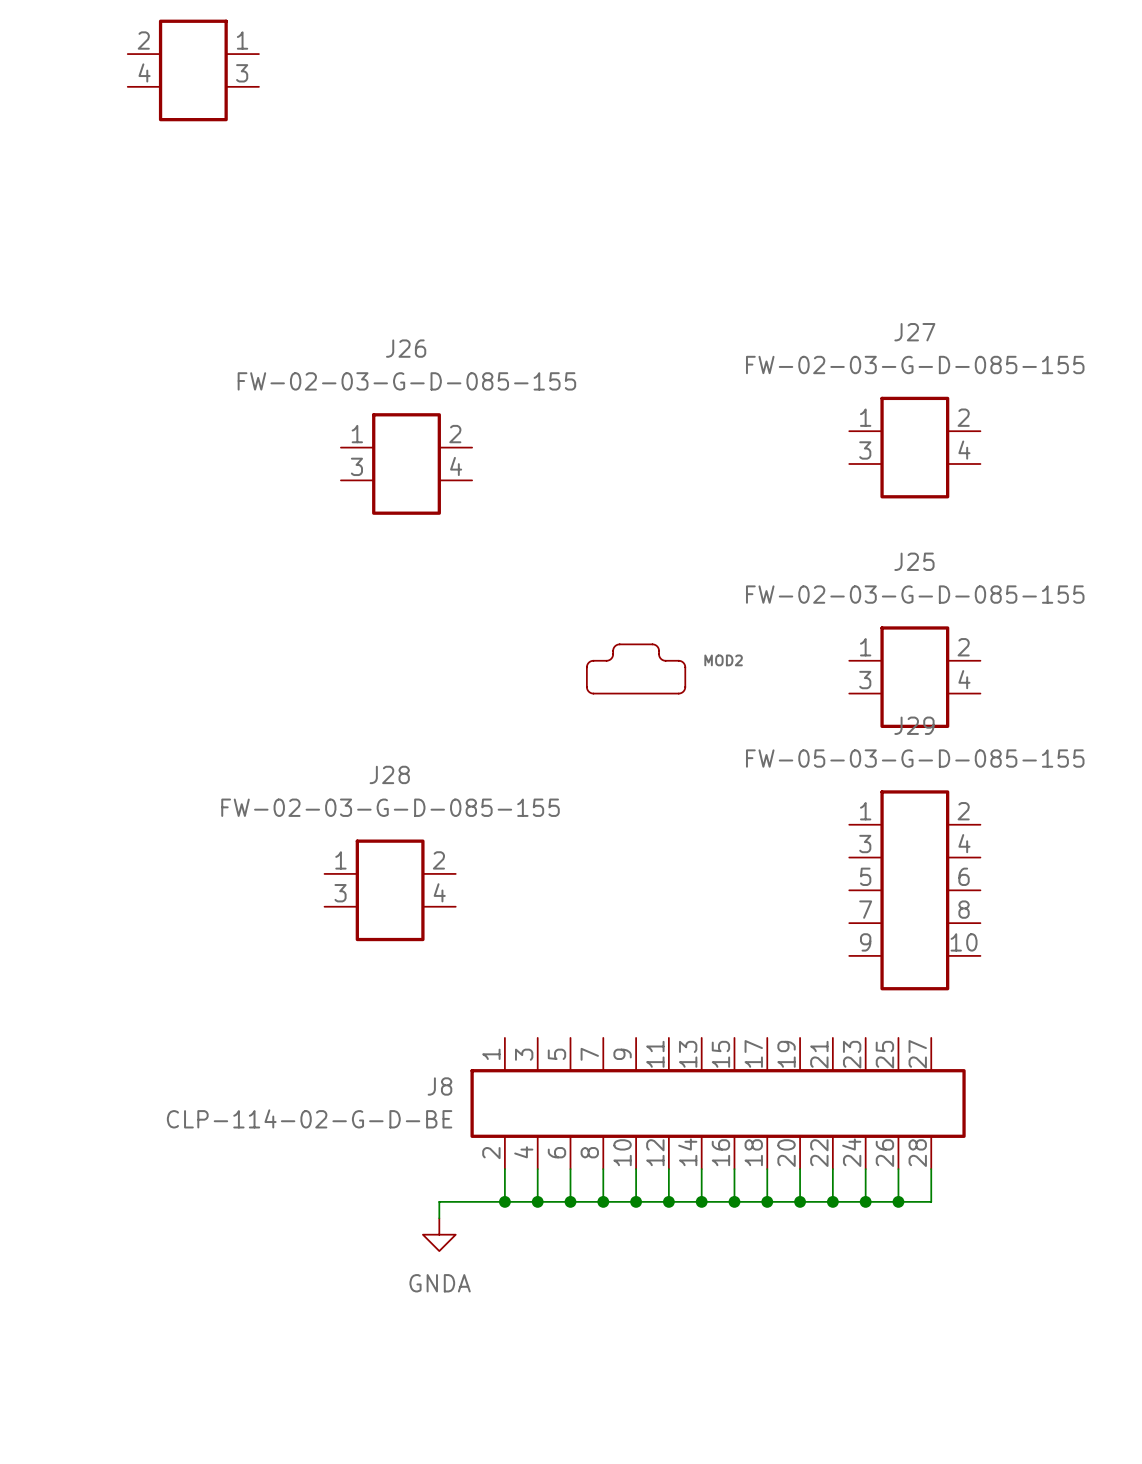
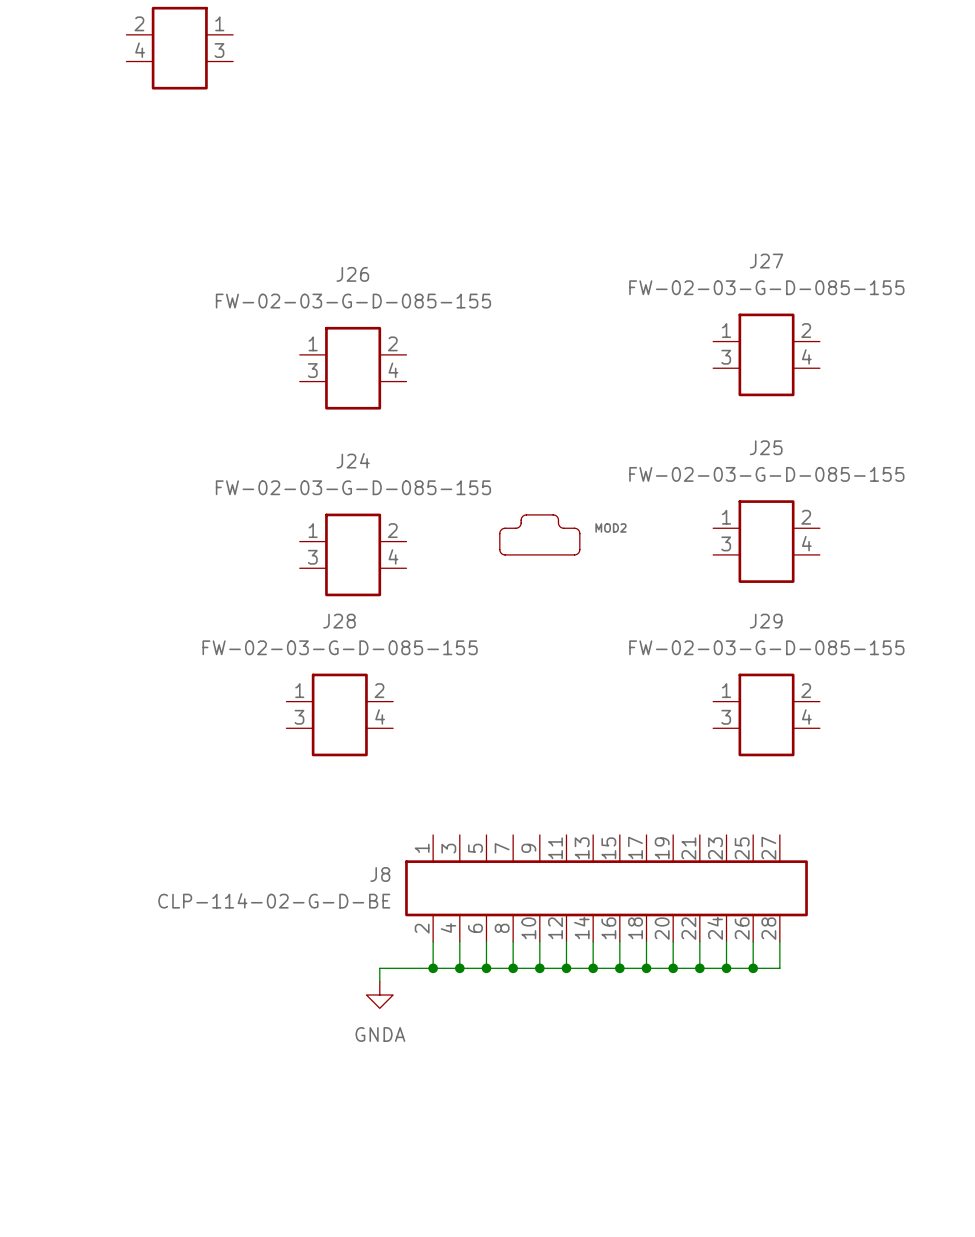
J24: none -> FW-02-03-G-D-085-155 (353, 554)
J29 name position: J29 (914, 725) -> J29 (766, 621)
J29 value: FW-05-03-G-D-085-155 (915, 758) -> FW-02-03-G-D-085-155 (766, 647)
J29 symbol: [849, 790, 981, 991] -> [713, 673, 820, 757]

